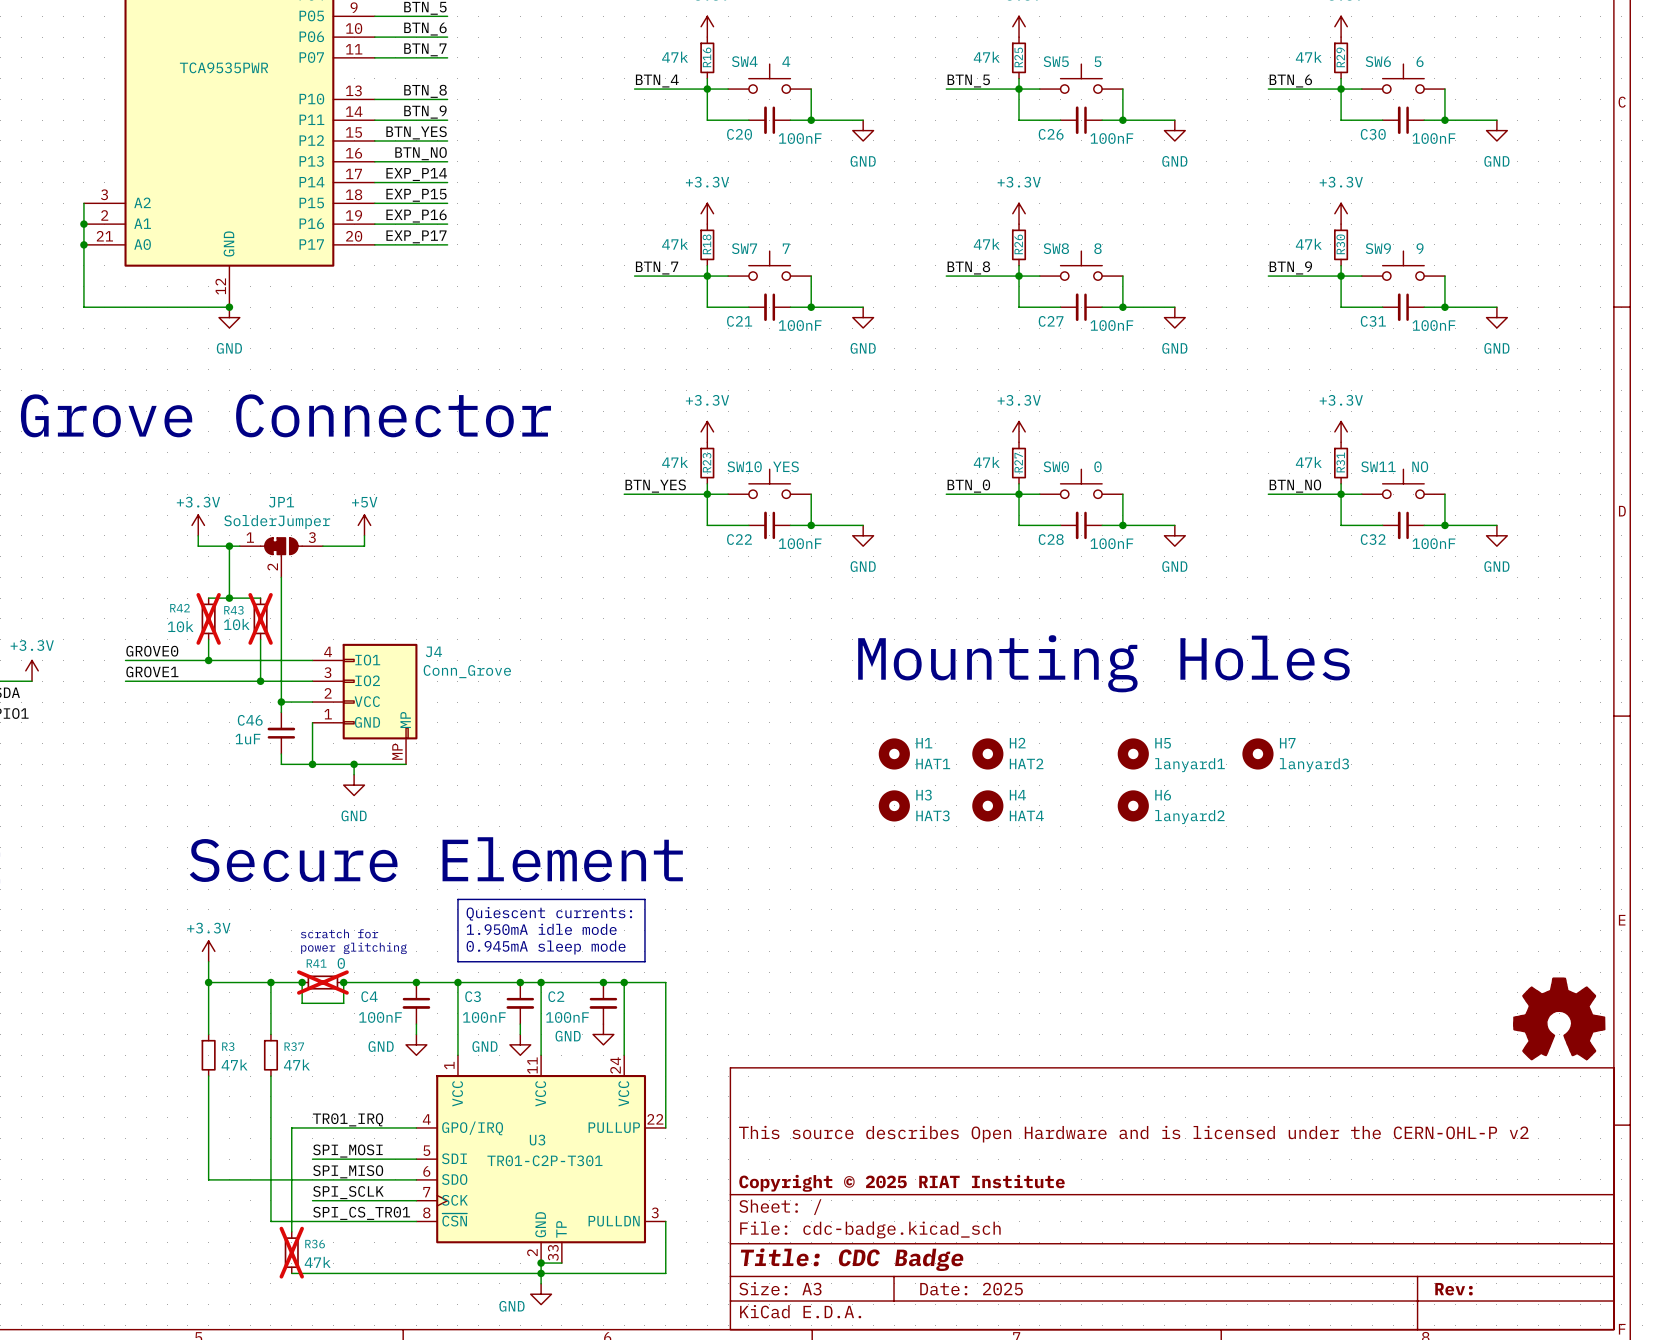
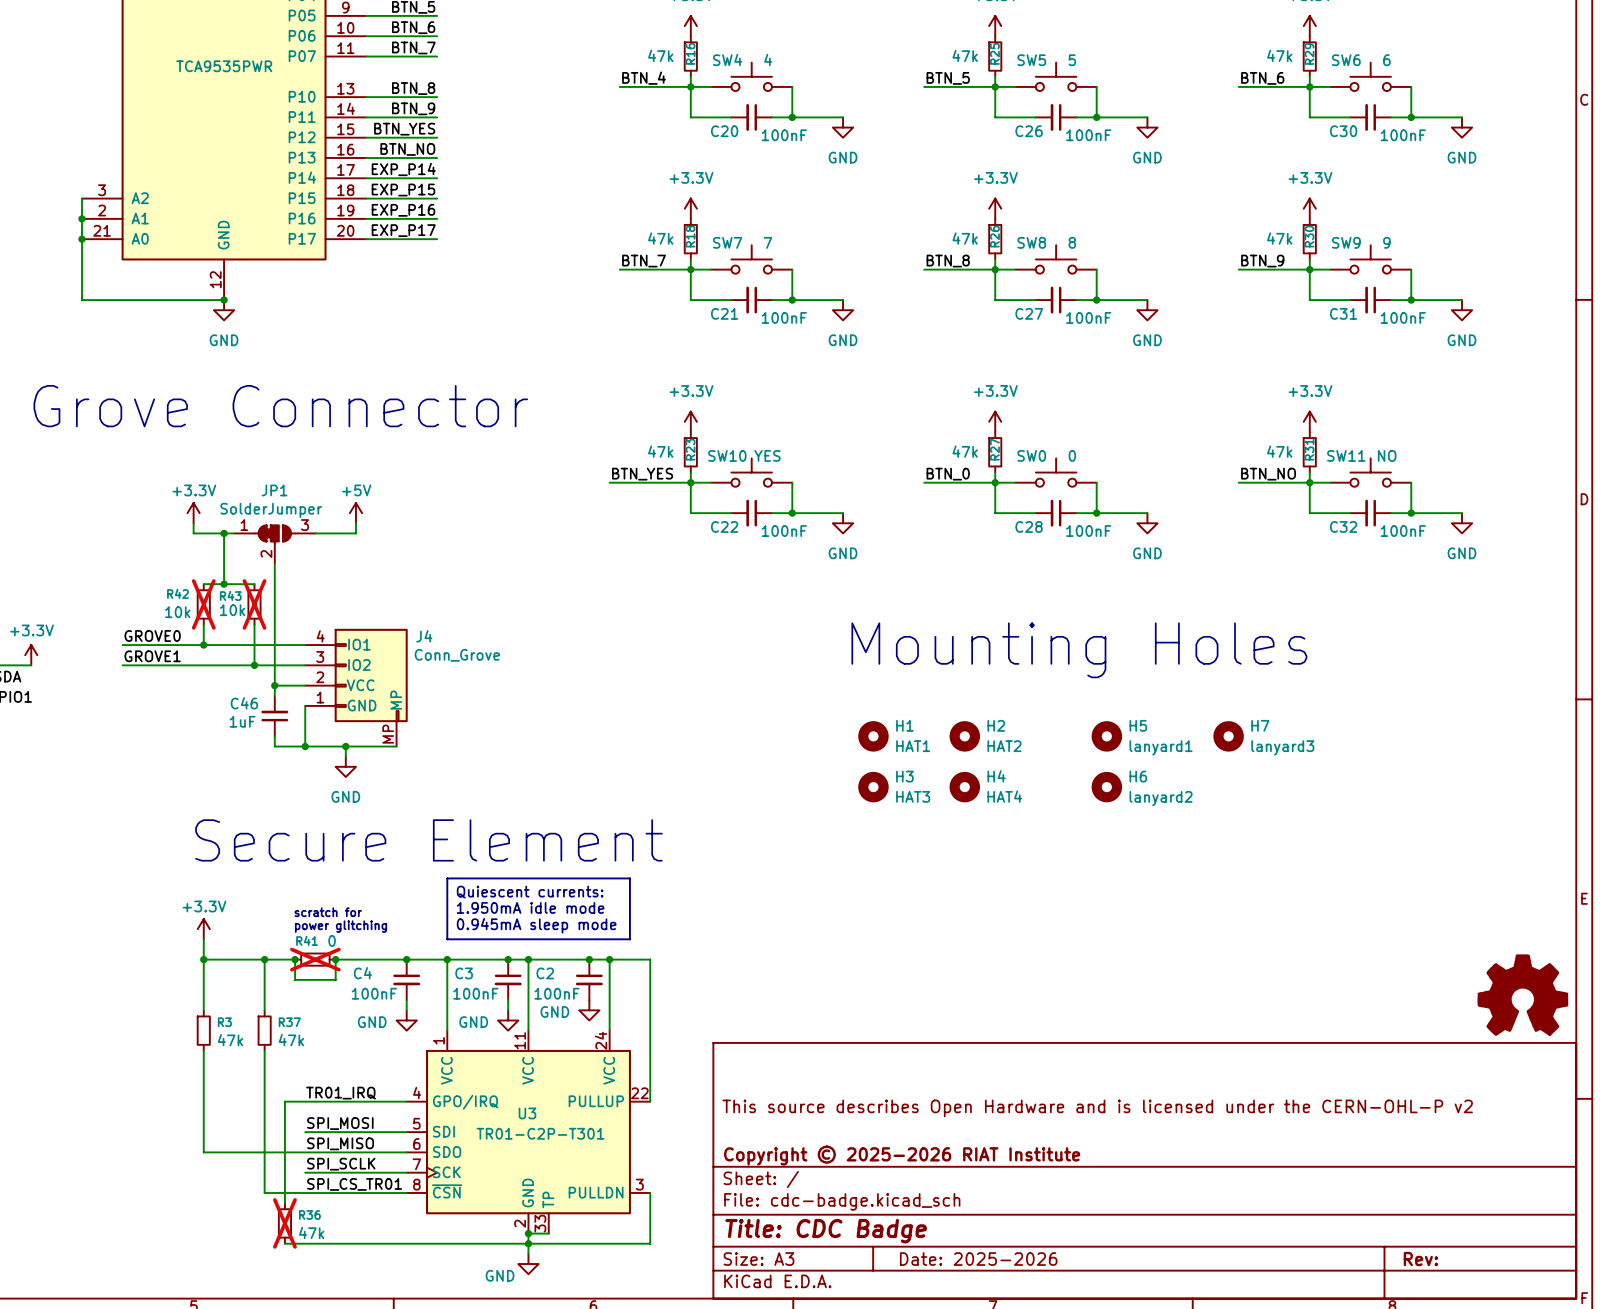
title block: Copyright © 2025 RIAT Institute (901, 1183) -> Copyright © 2025-2026 RIAT Institute (902, 1155)
title block: Date: 2025 (971, 1289) -> Date: 2025-2026 (978, 1259)

